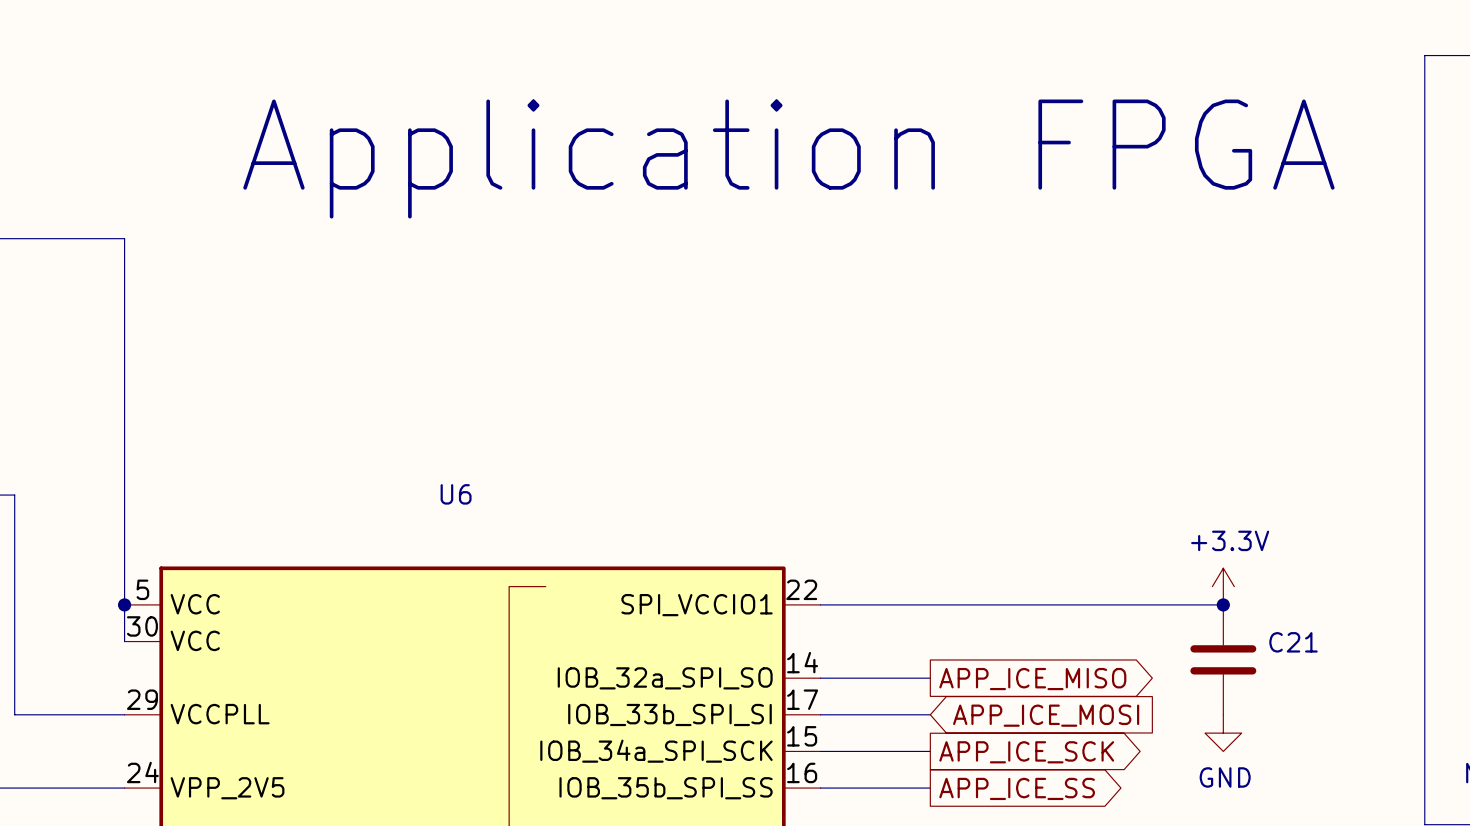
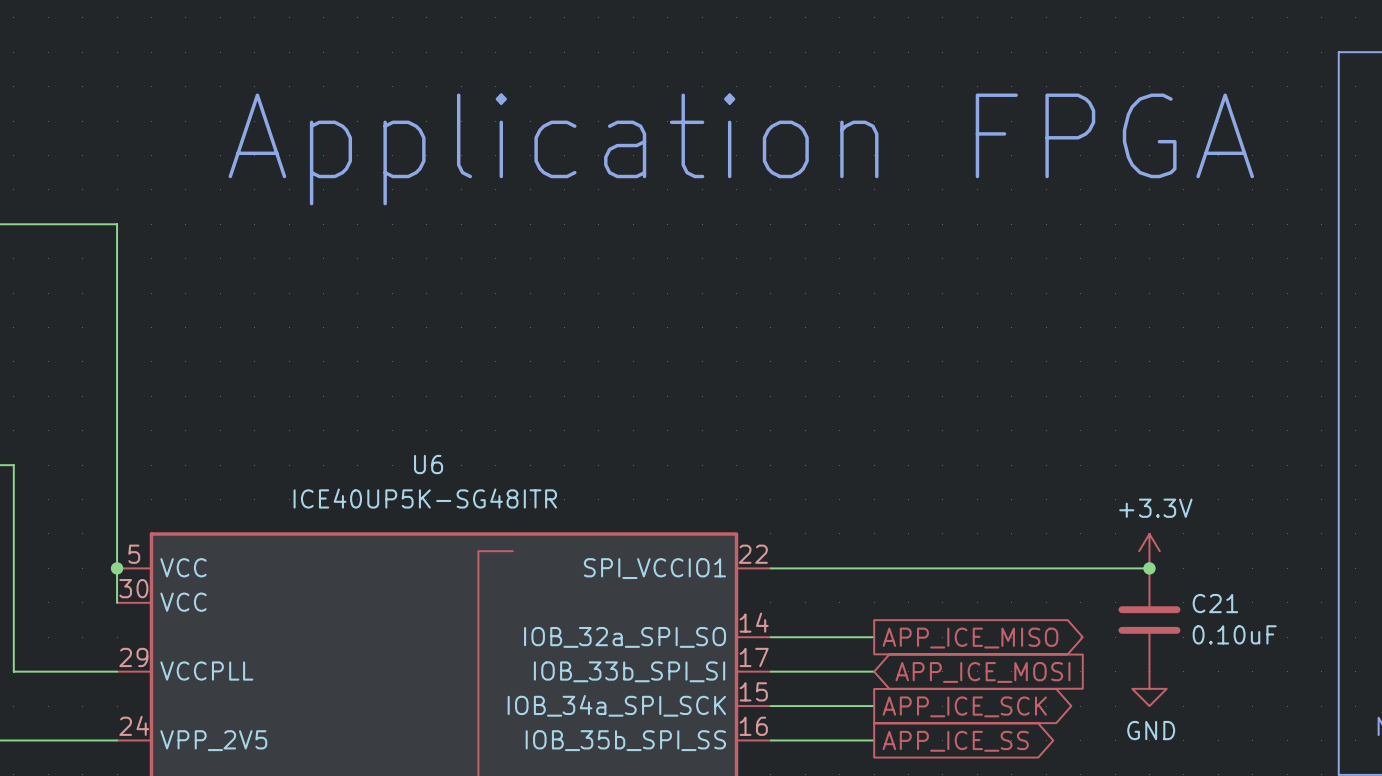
U6 value: none -> ICE40UP5K-SG48ITR (425, 498)
C21 value: none -> 0.10uF (1234, 634)

